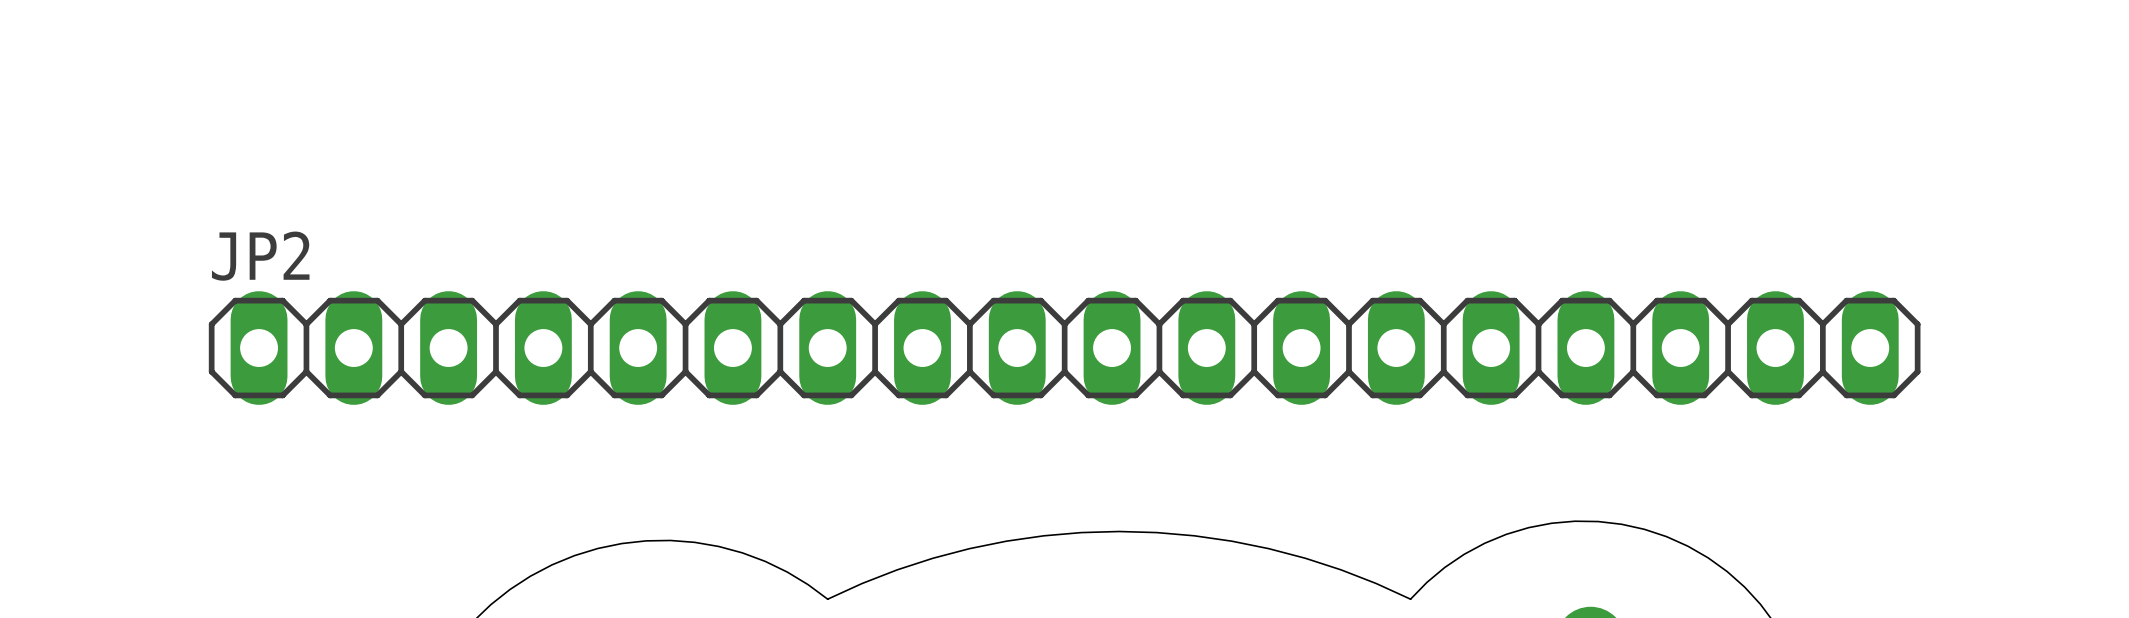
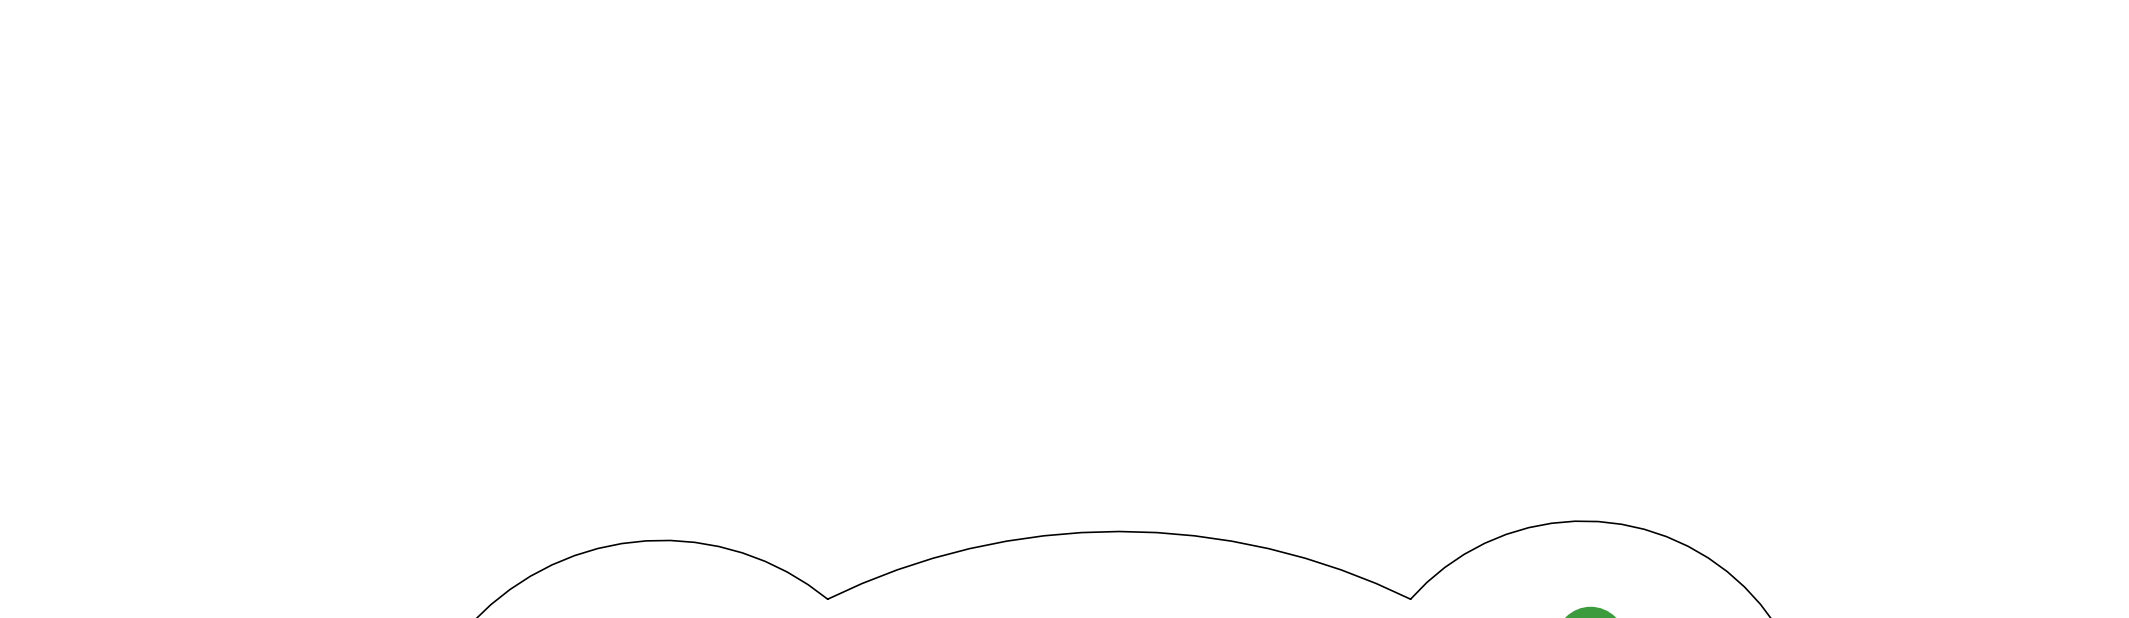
JP2: (1064, 348) -> none

